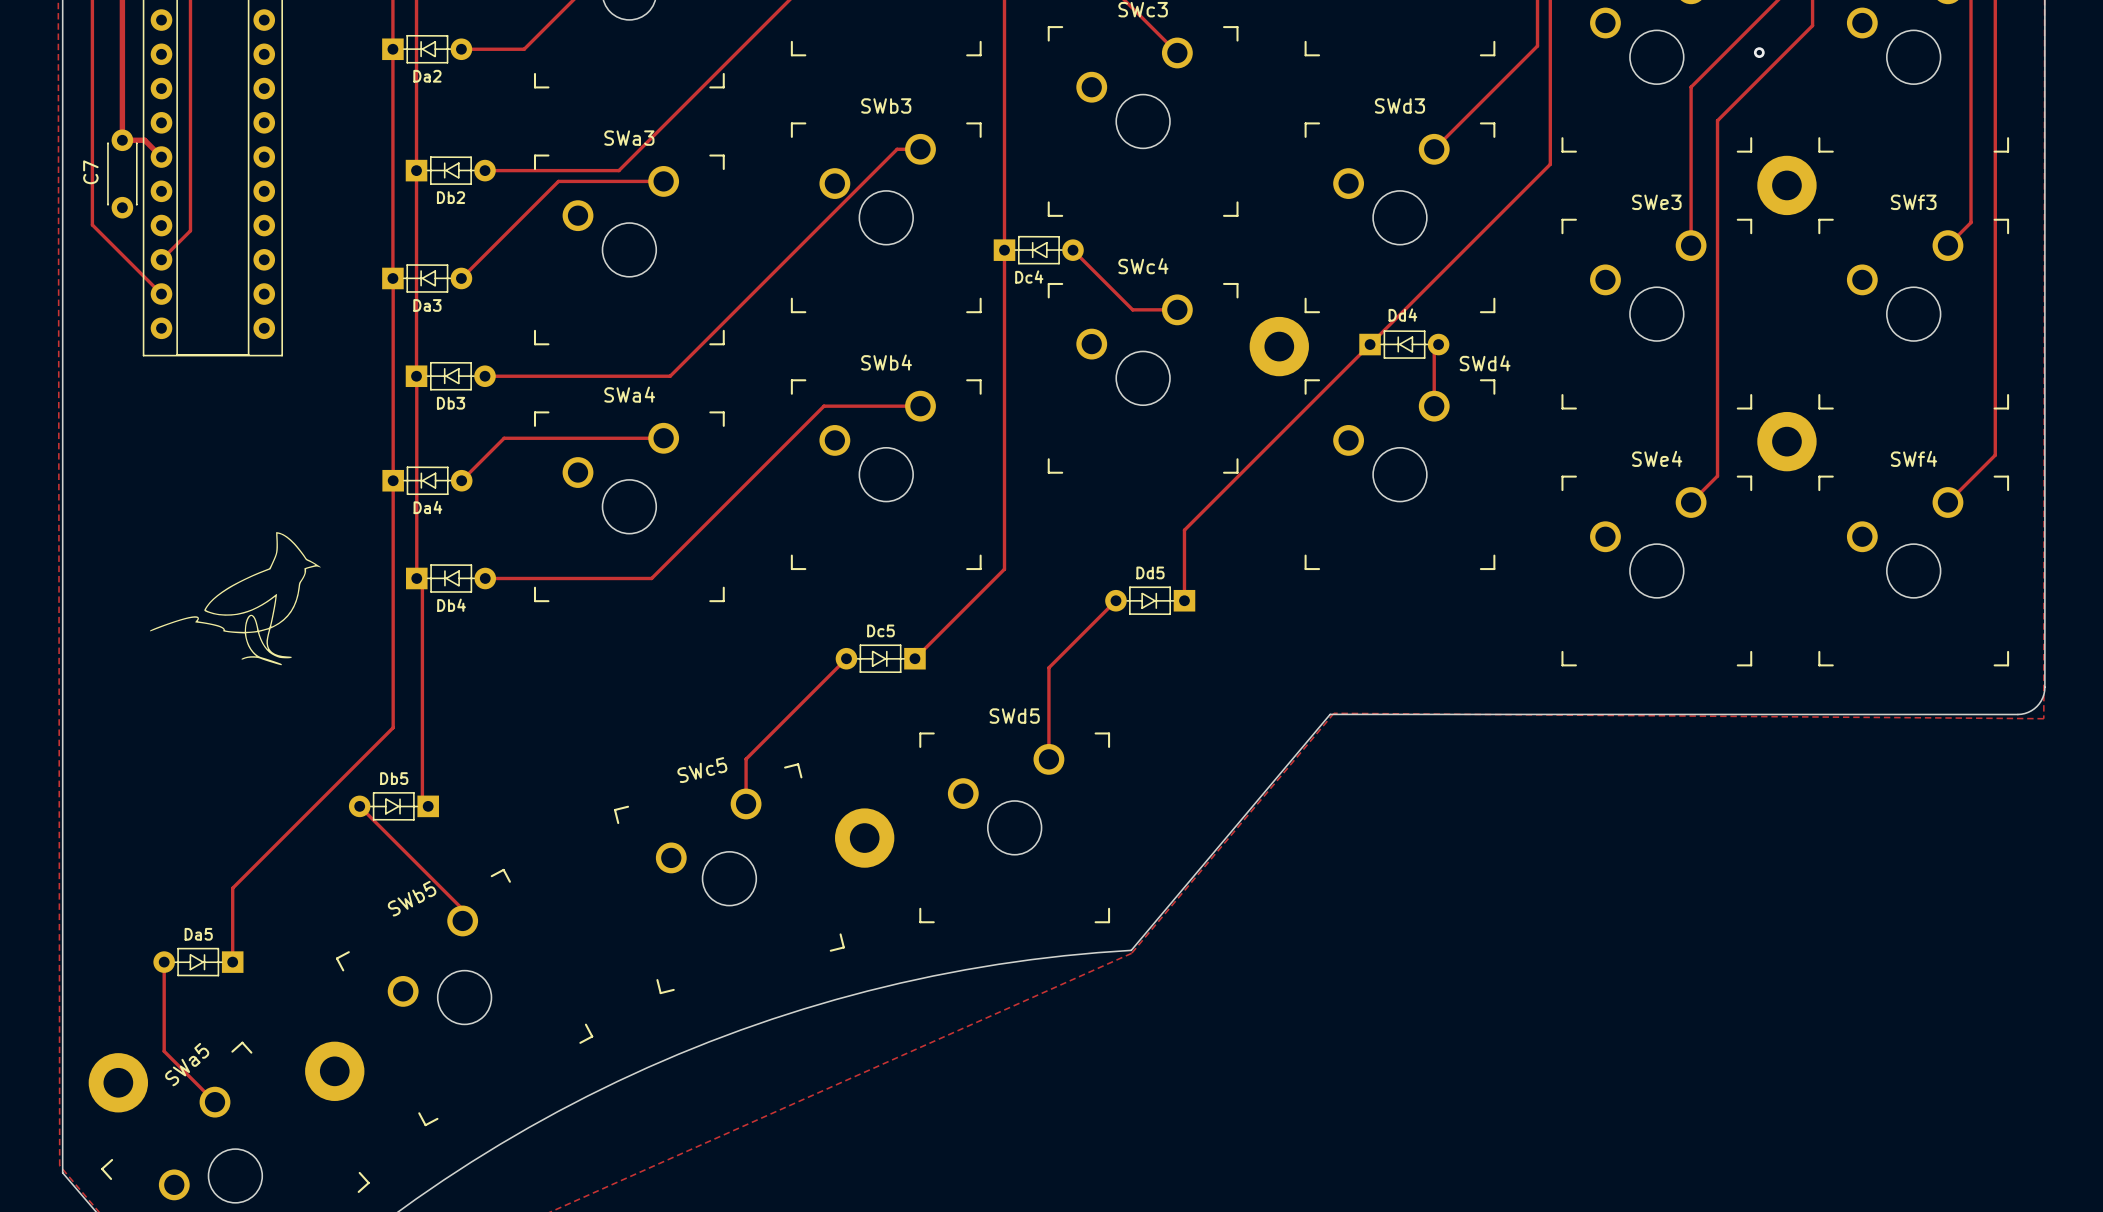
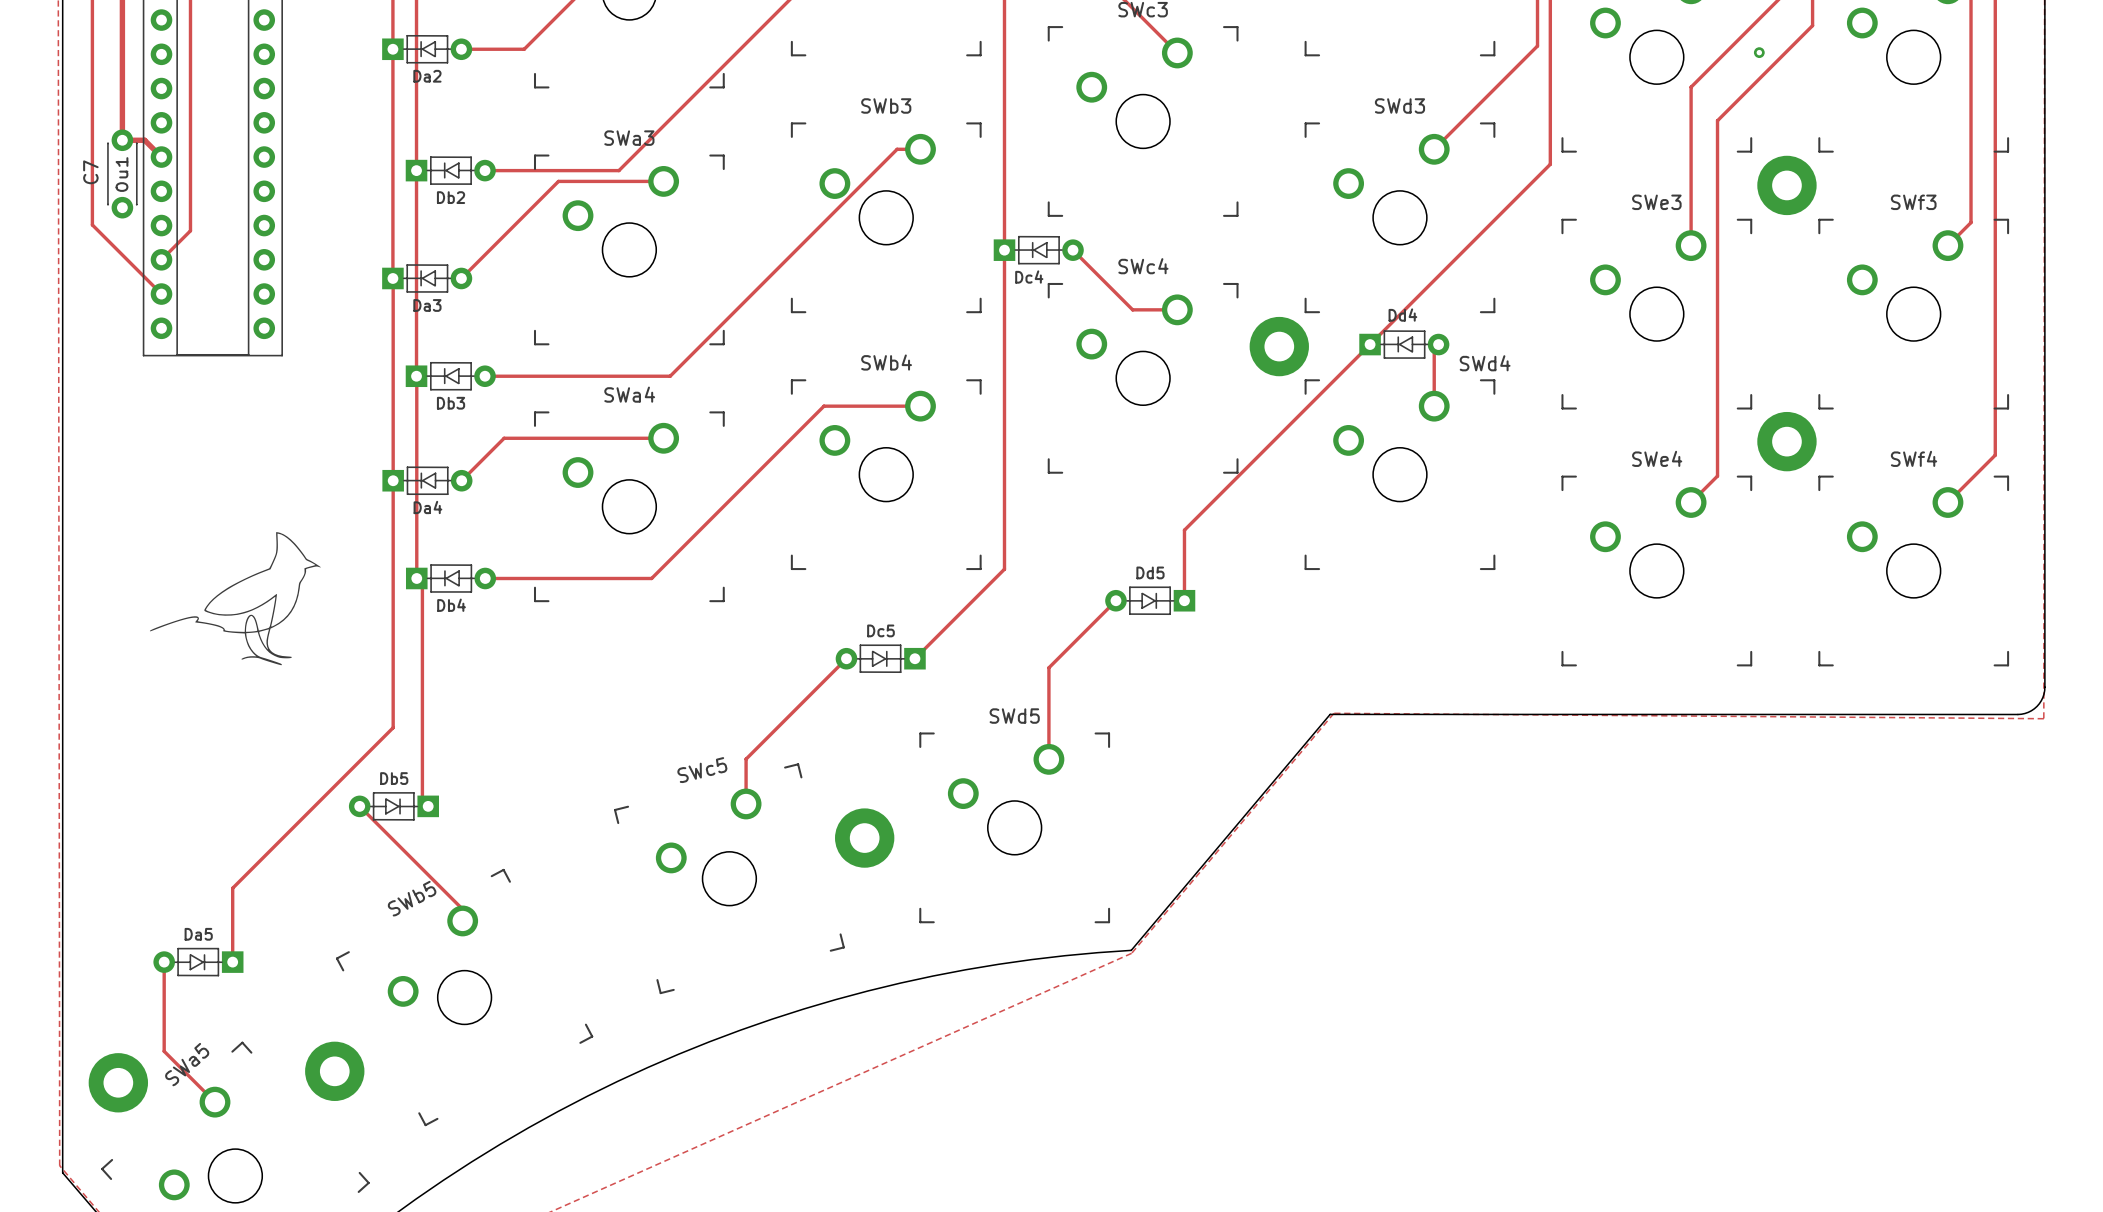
C7 value: none -> 0u1 (121, 174)

